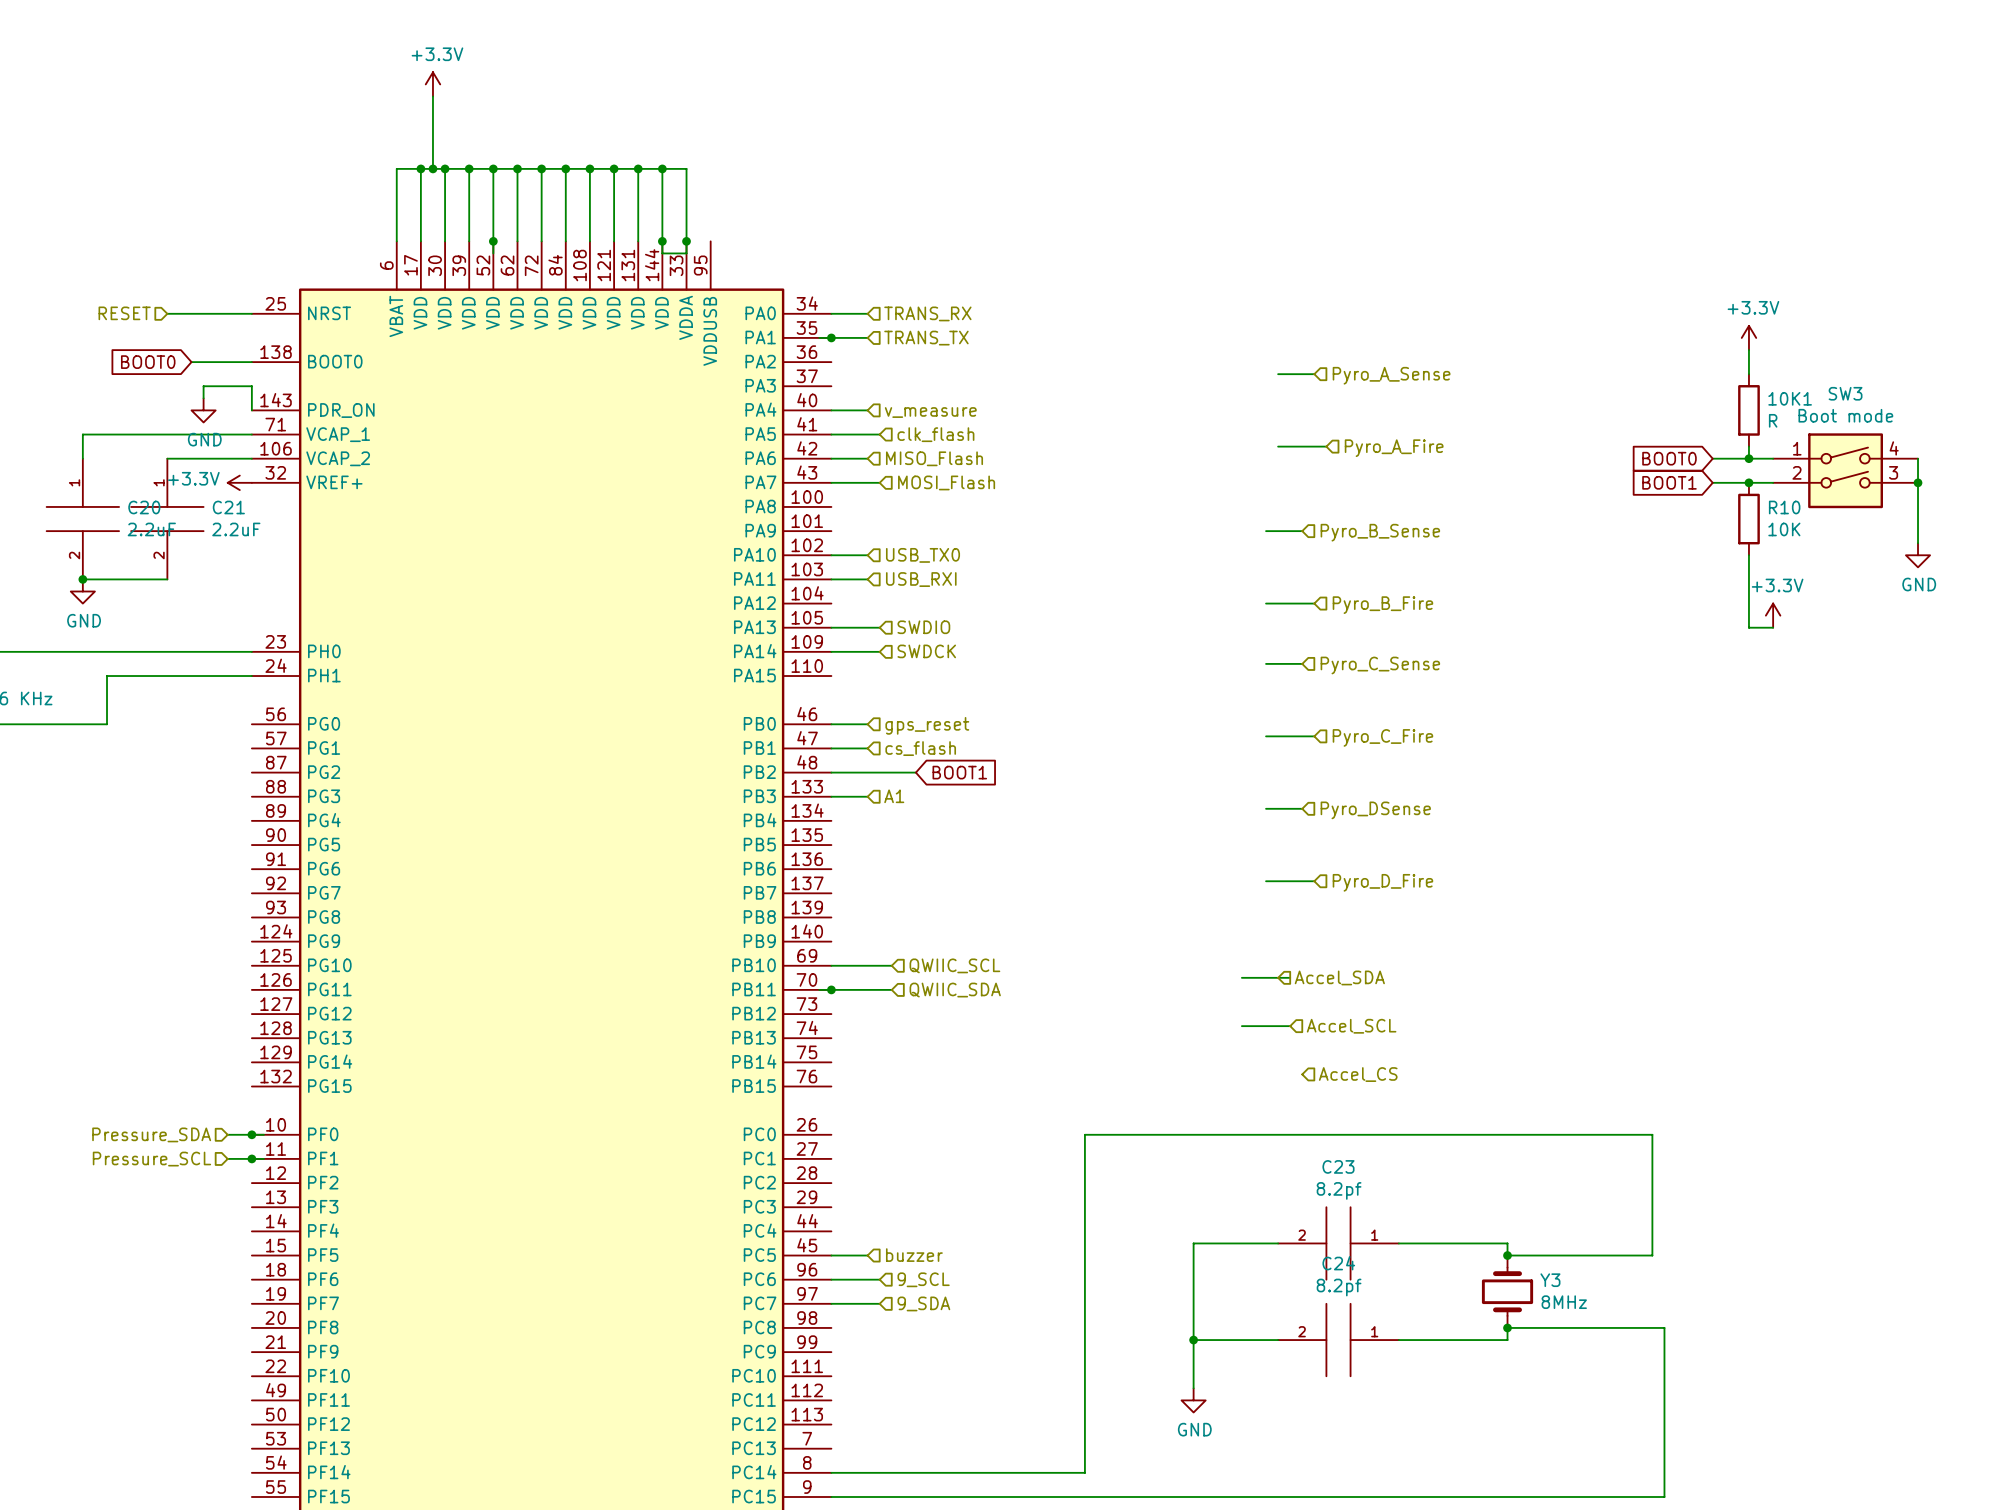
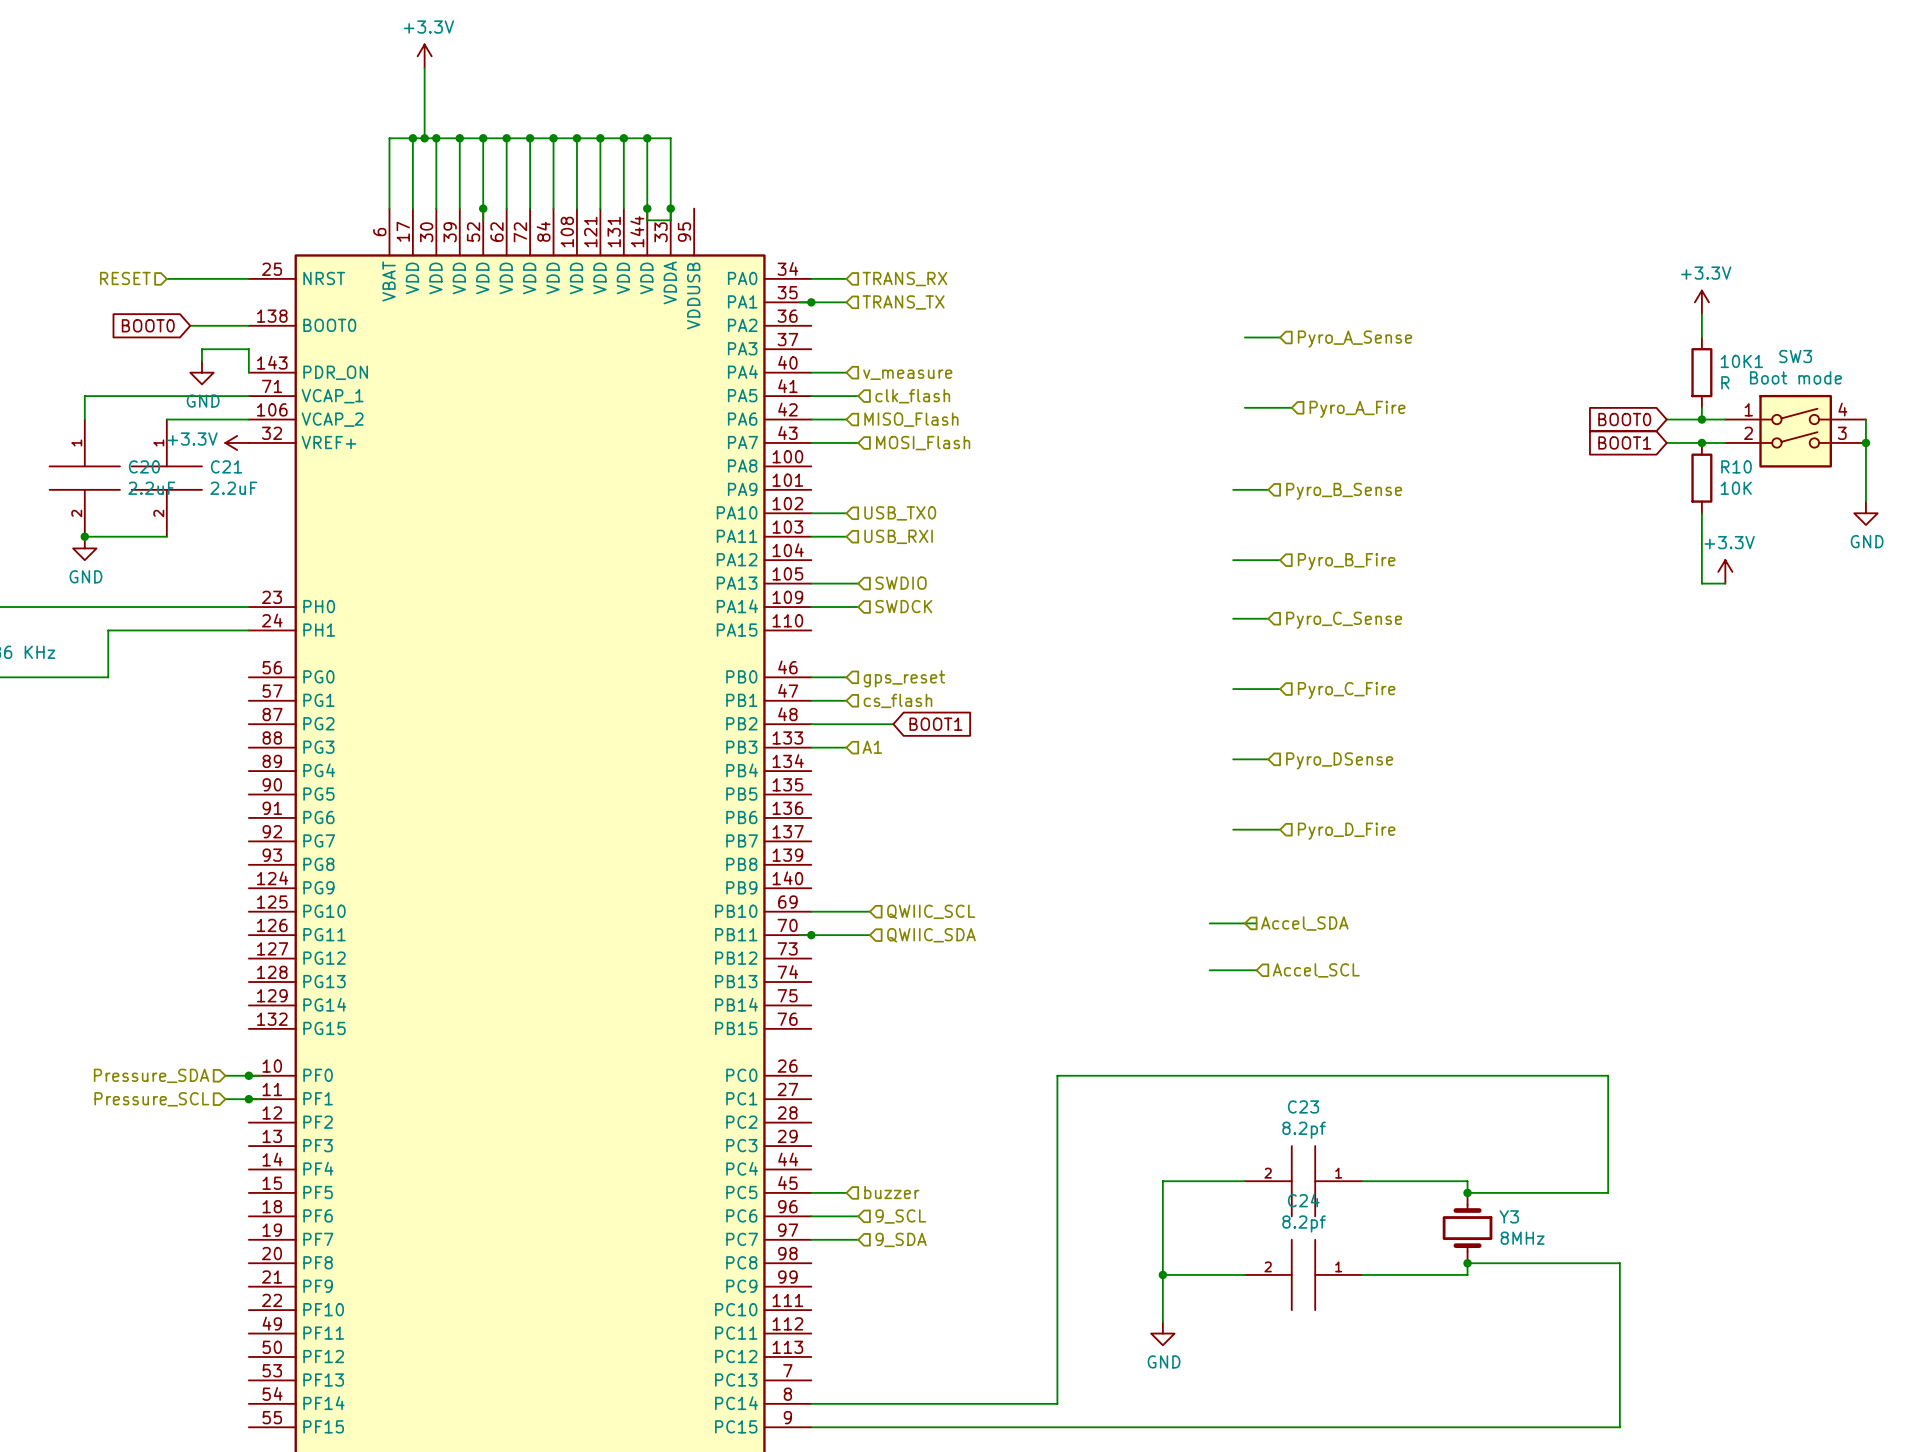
hierarchical label: Accel_CS (1358, 1074) -> none

